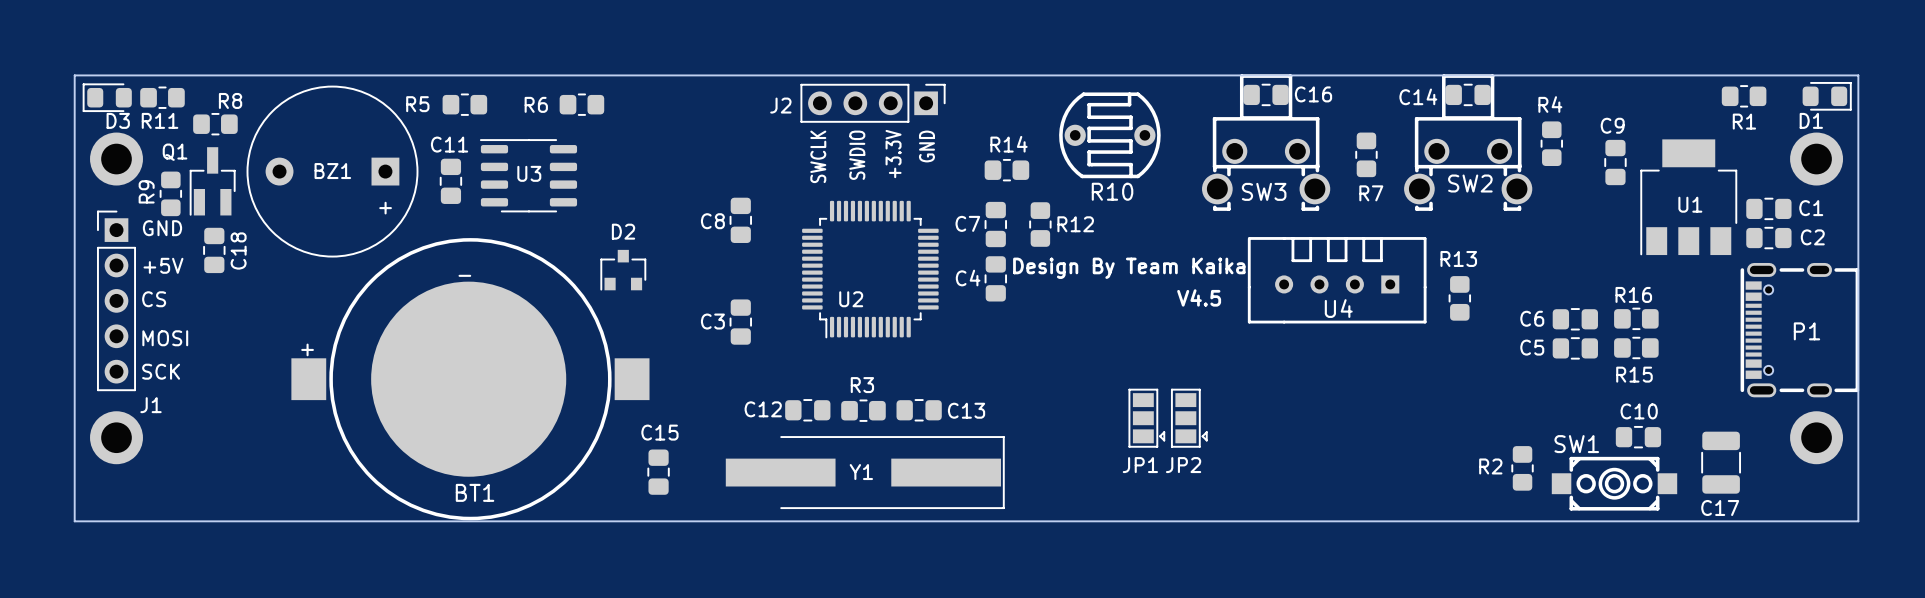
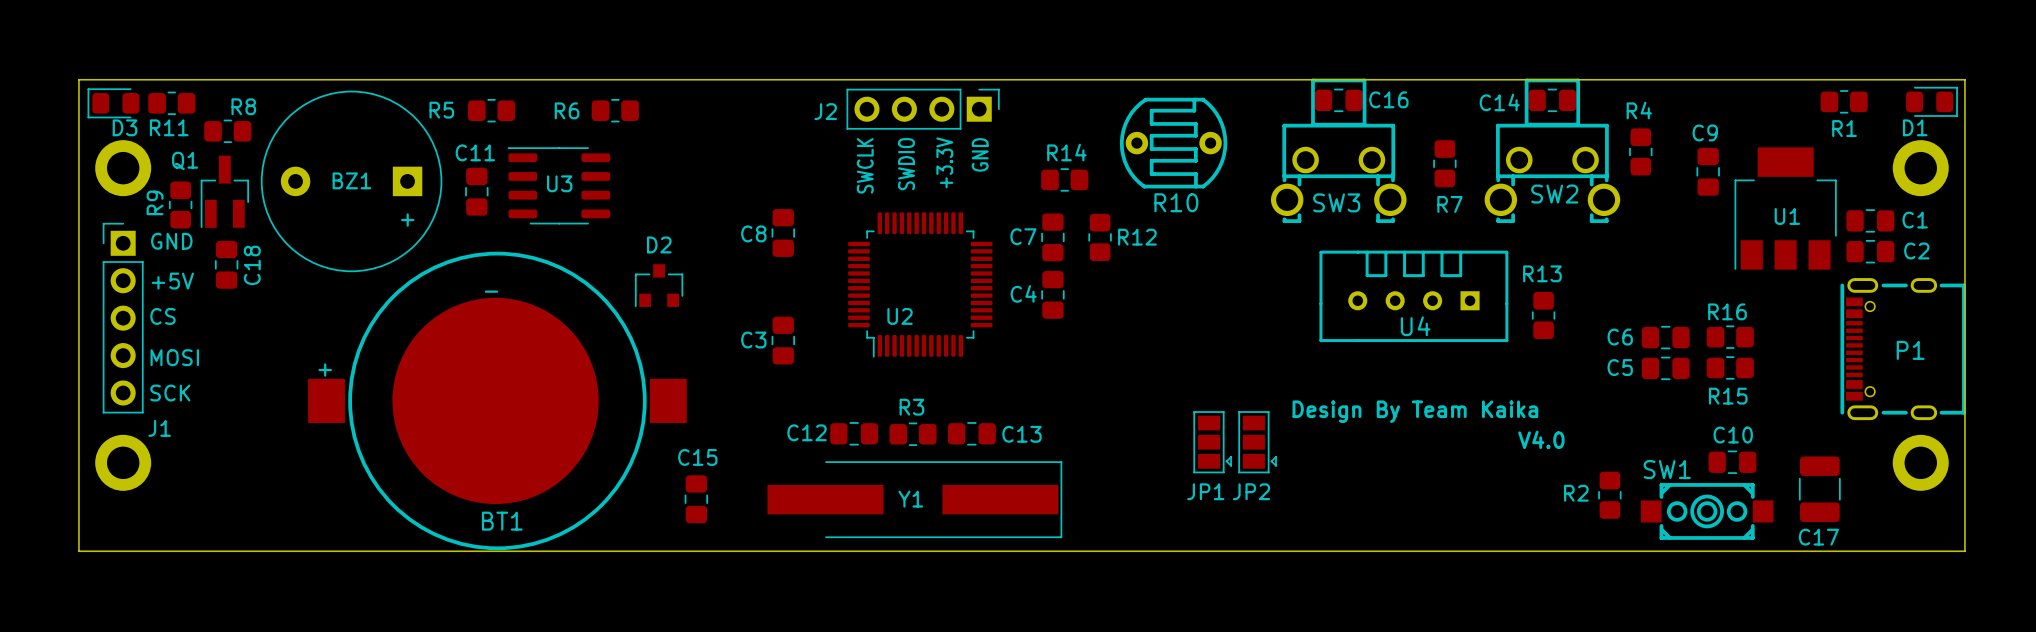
text position: Design By Team Kaika (1129, 268) -> Design By Team Kaika (1415, 411)
text: V4.5 (1199, 297) -> none
text: none -> V4.0 (1541, 439)

